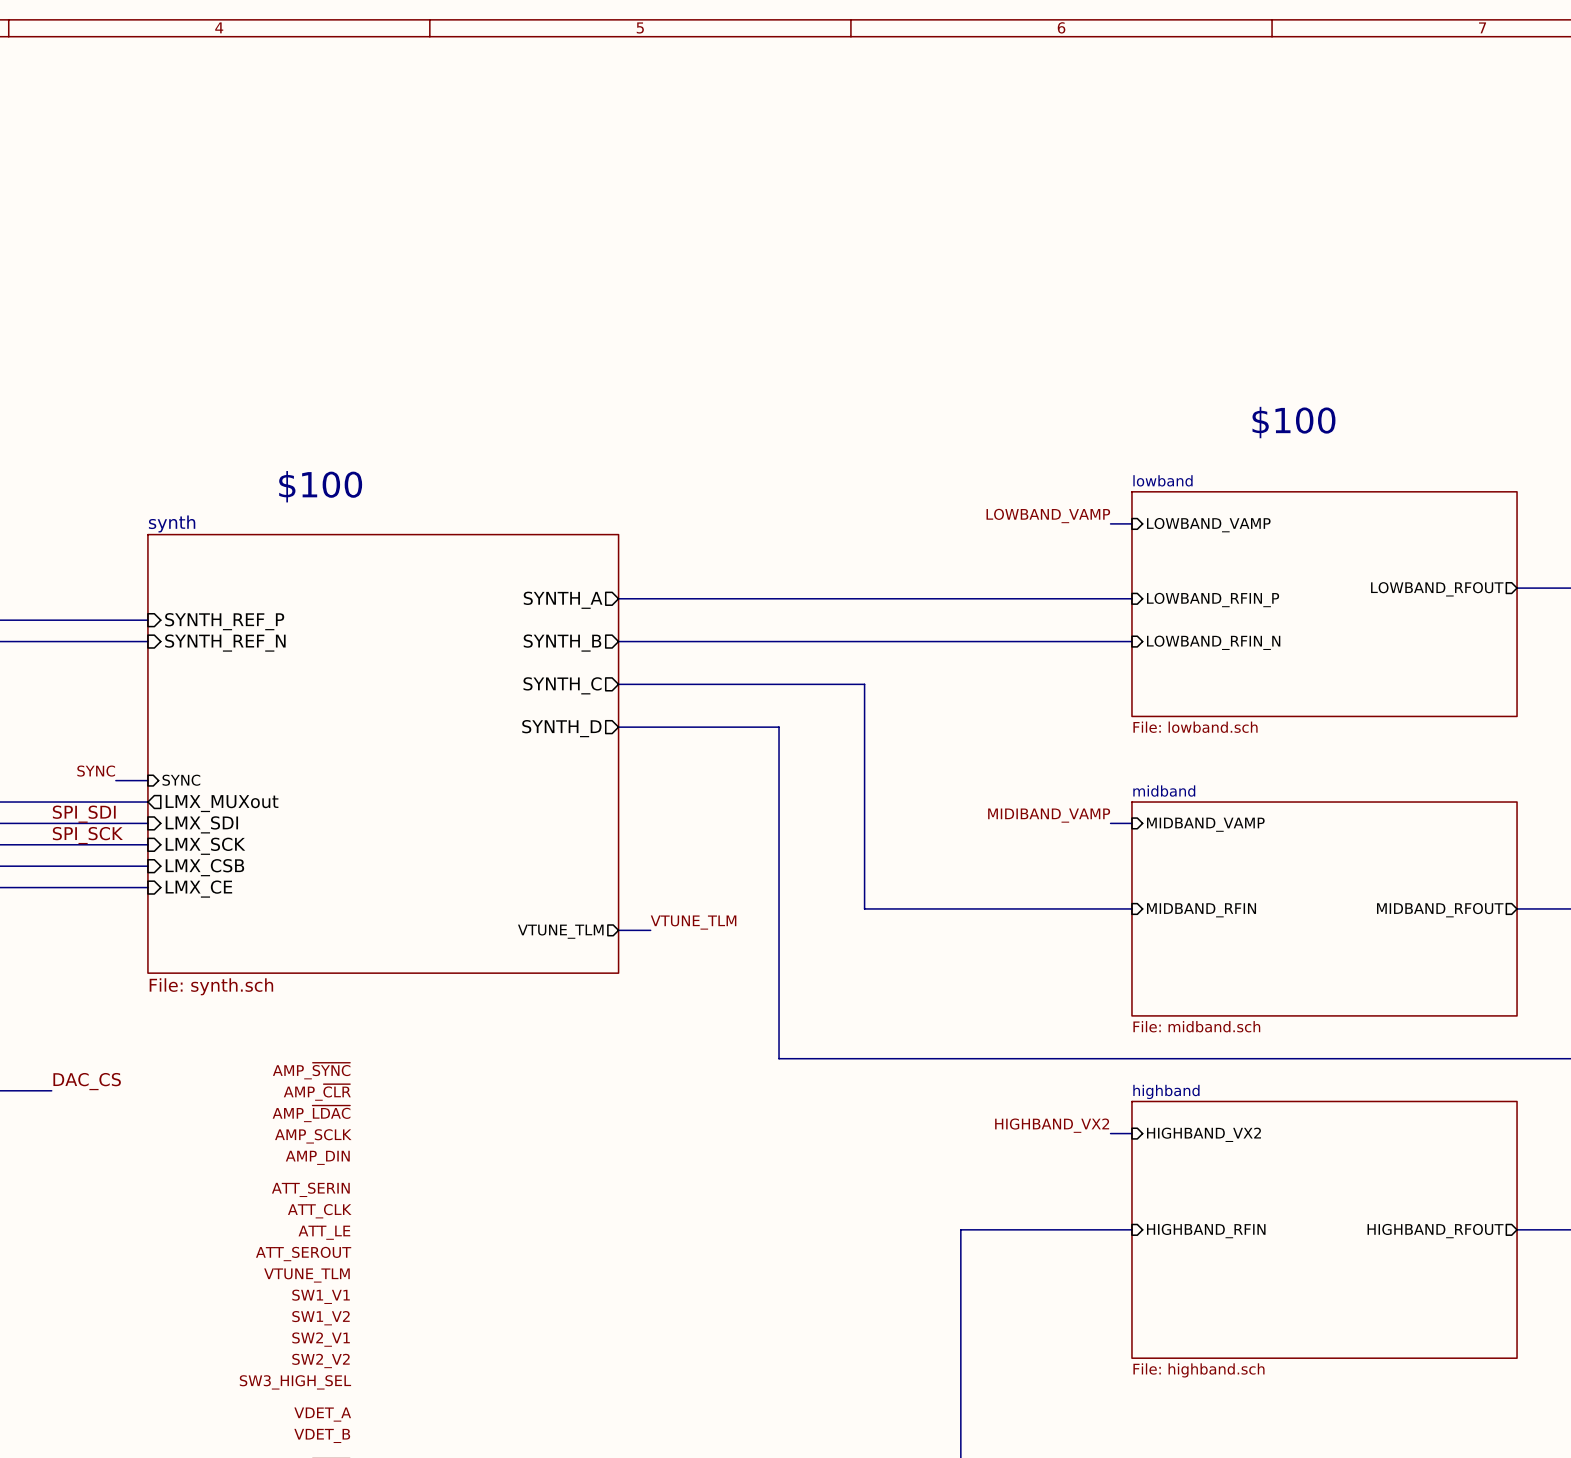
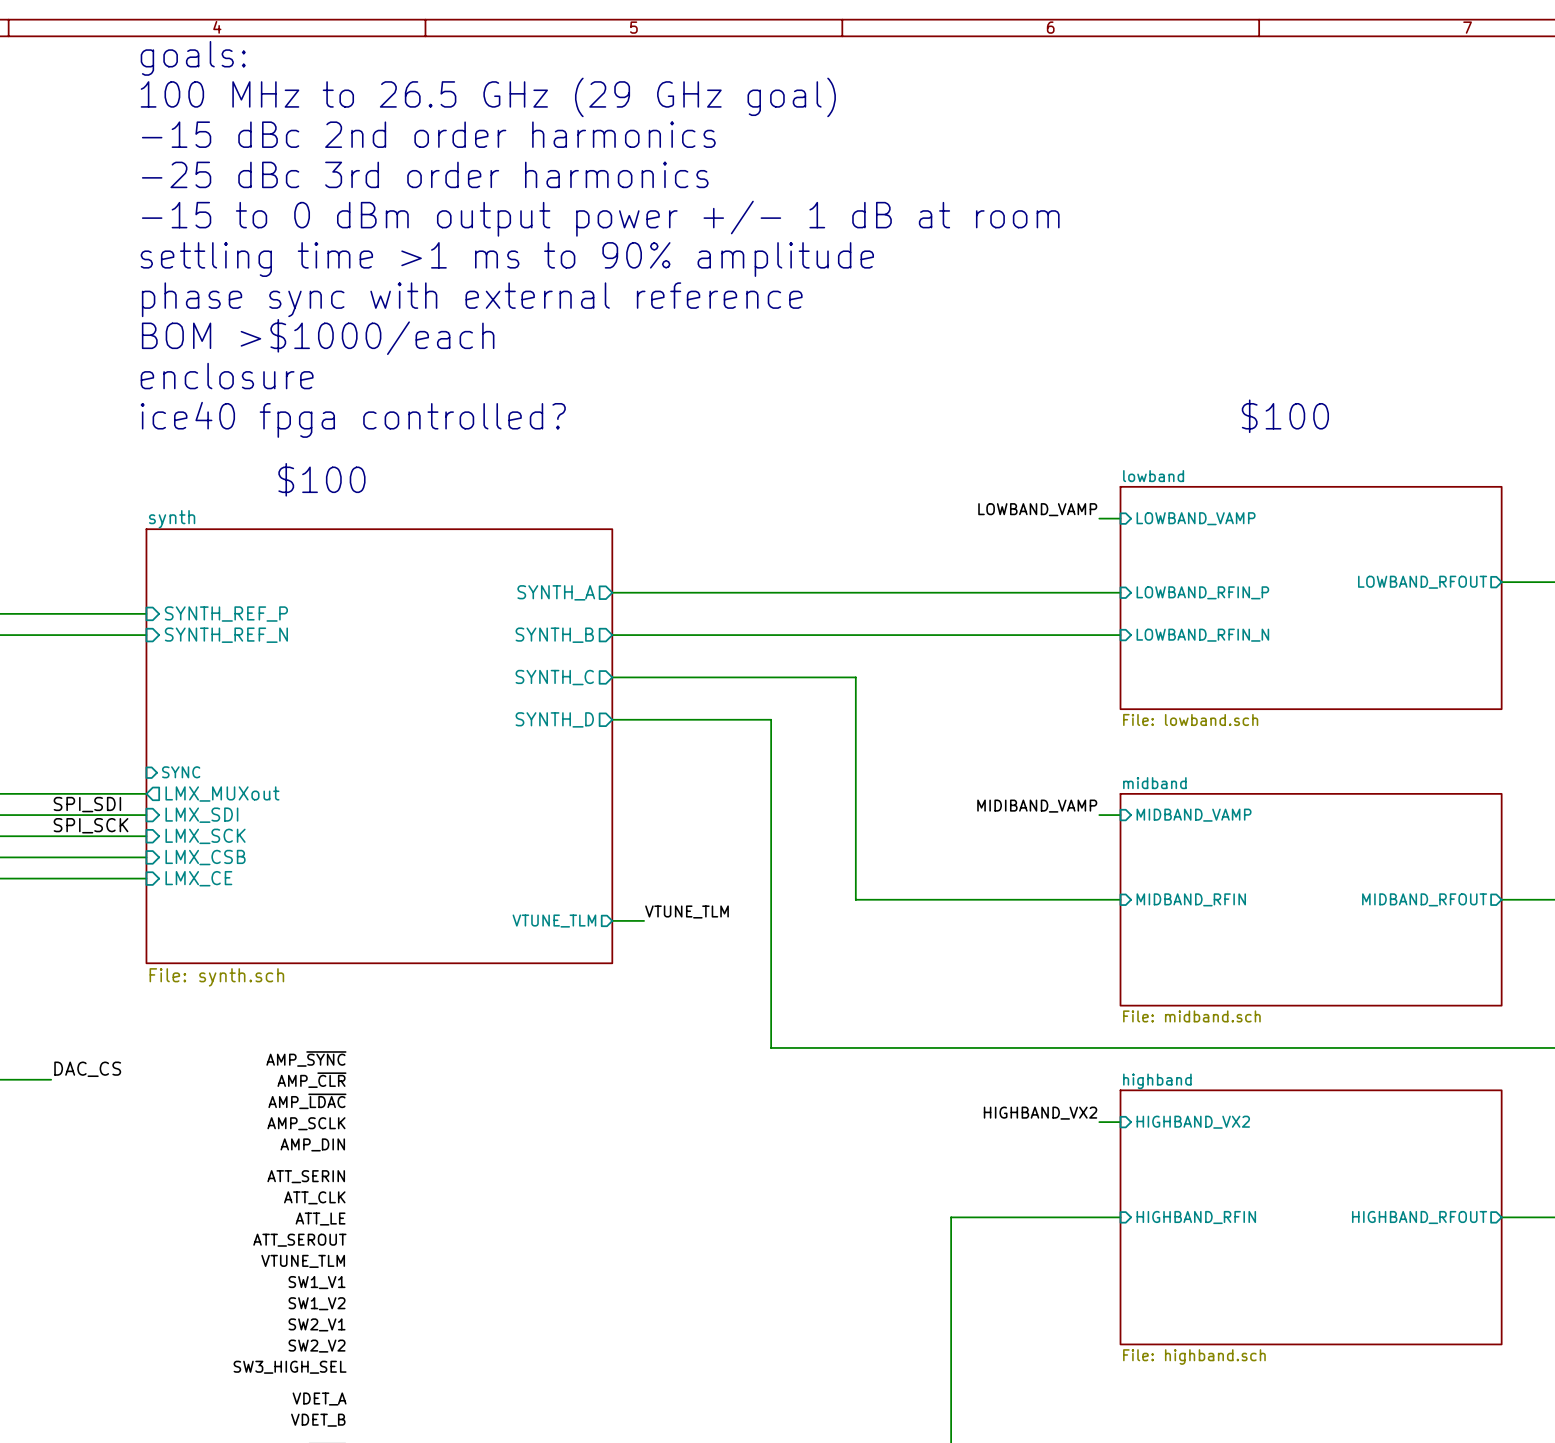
text: none -> goals: (193, 58)
text: none -> 100 MHz to 26.5 GHz (29 GHz goal) (488, 97)
text: none -> -15 dBc 2nd order harmonics (428, 134)
text: none -> -25 dBc 3rd order harmonics (425, 174)
text: none -> -15 to 0 dBm output power +/- 1 dB at room (600, 218)
text: none -> settling time >1 ms to 90% amplitude (507, 259)
text: none -> phase sync with external reference (472, 299)
text: none -> BOM >$1000/each (318, 337)
text: none -> enclosure (227, 376)
text: none -> ice40 fpga controlled? (353, 419)
label: SYNC (96, 771) -> none
wire: (115, 780) (147, 780) -> none

